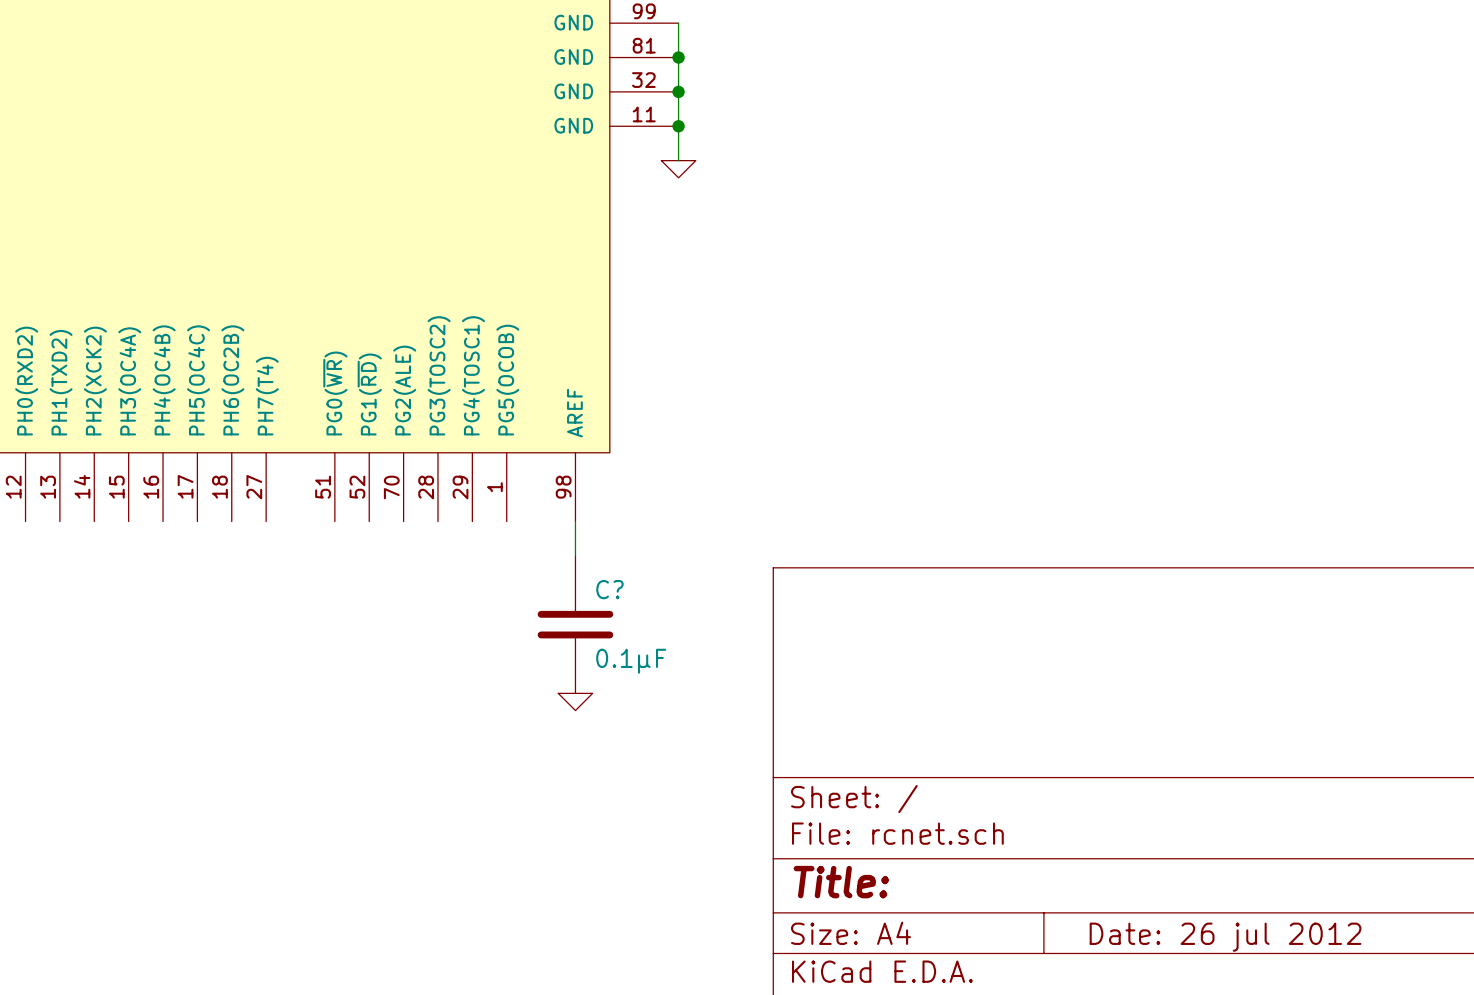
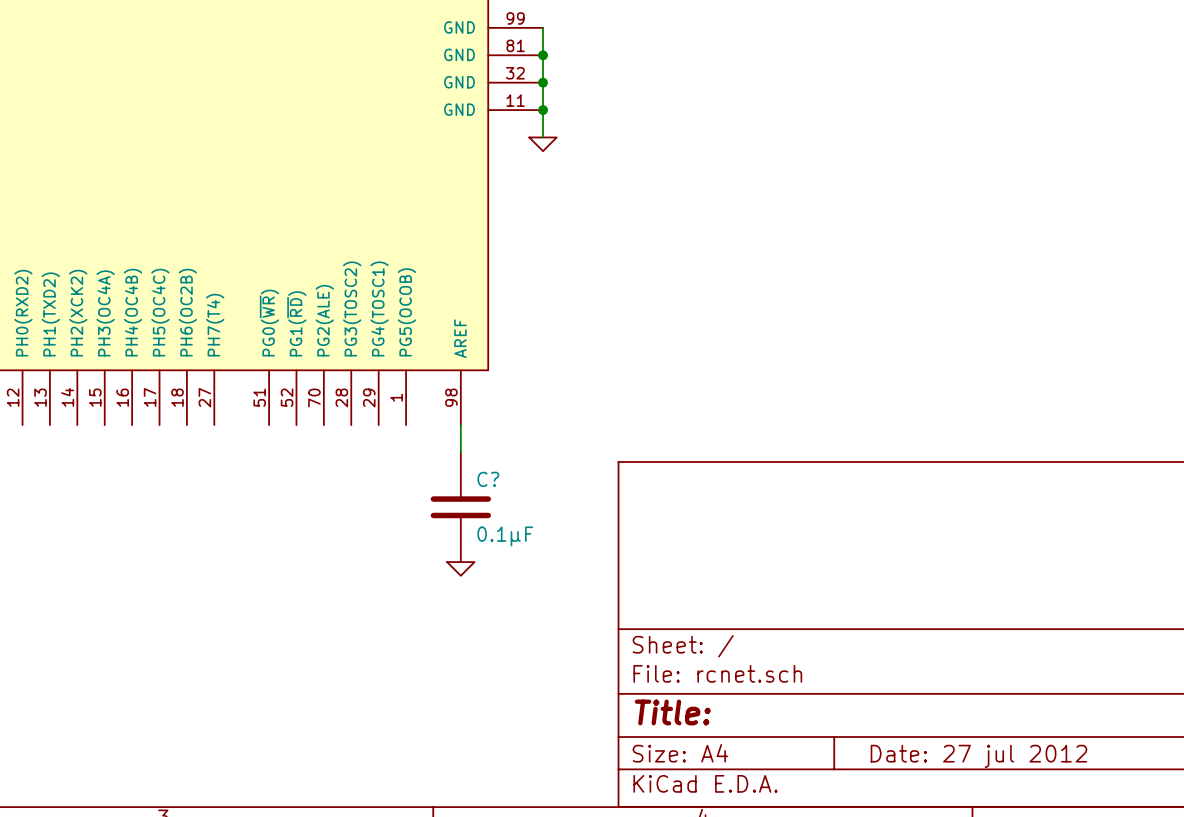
title block: Date: 26 jul 2012 (1225, 937) -> Date: 27 jul 2012 (978, 756)

